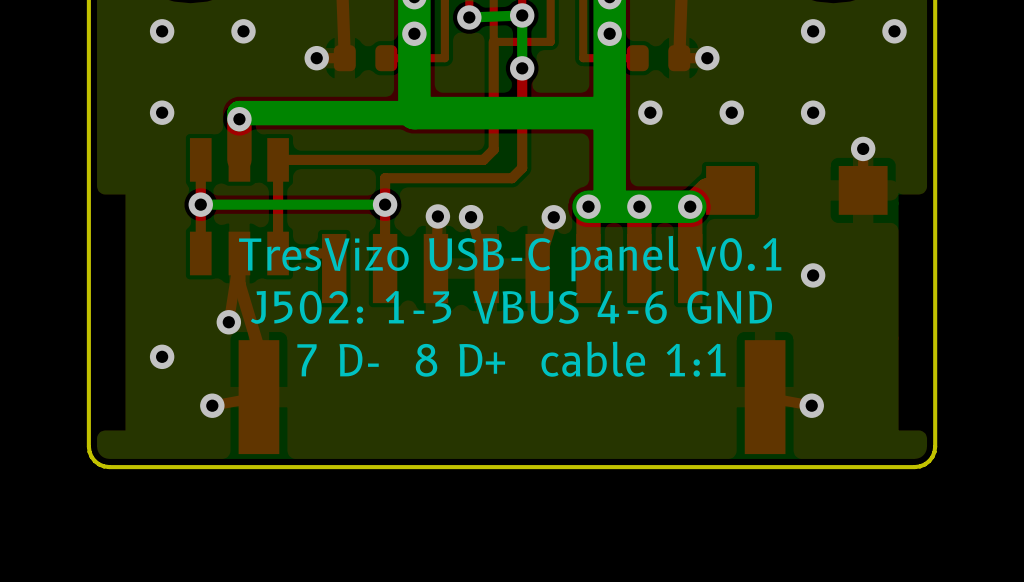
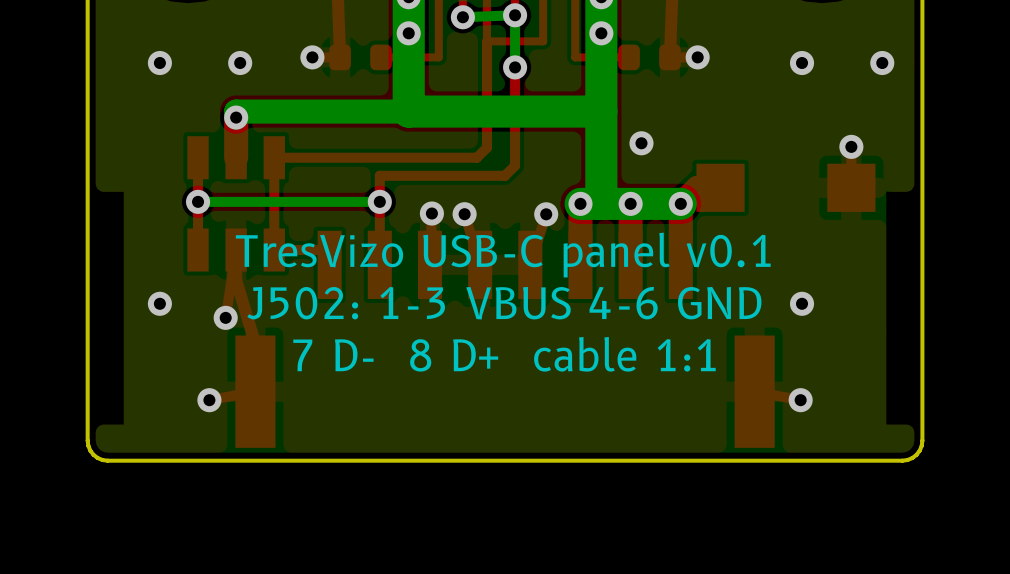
via: (162, 31) -> none
via position: (243, 31) -> (240, 63)
via: (813, 31) -> none
via position: (894, 31) -> (882, 63)
via: none -> (159, 63)
via: none -> (802, 63)
via: (162, 112) -> none
via position: (650, 112) -> (641, 143)
via: (731, 112) -> none
via: (813, 112) -> none
via position: (813, 275) -> (802, 303)
via position: (162, 356) -> (159, 303)

